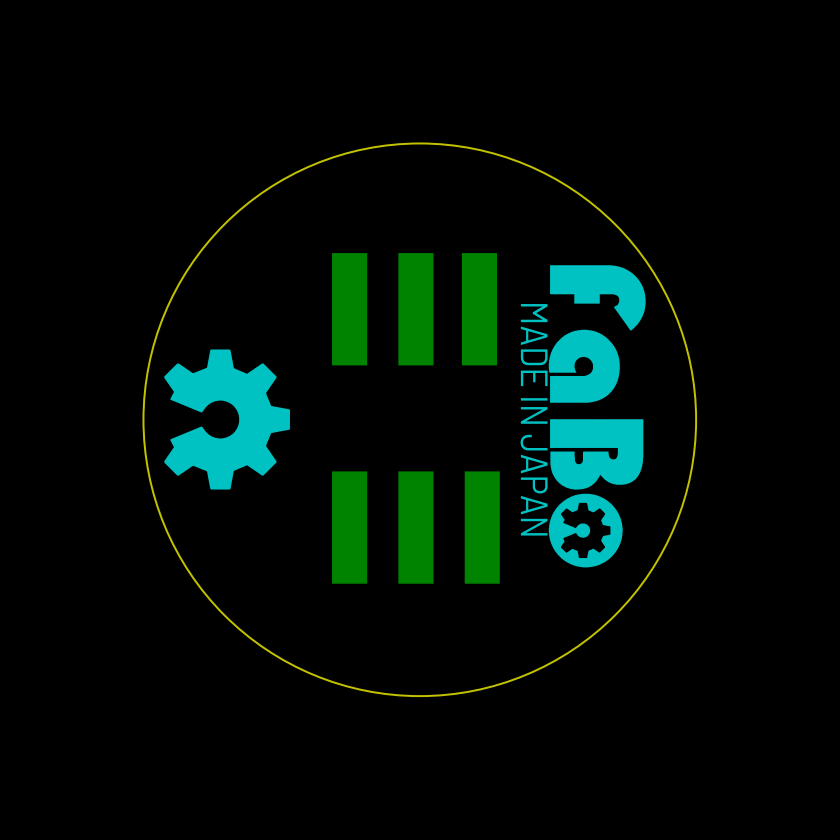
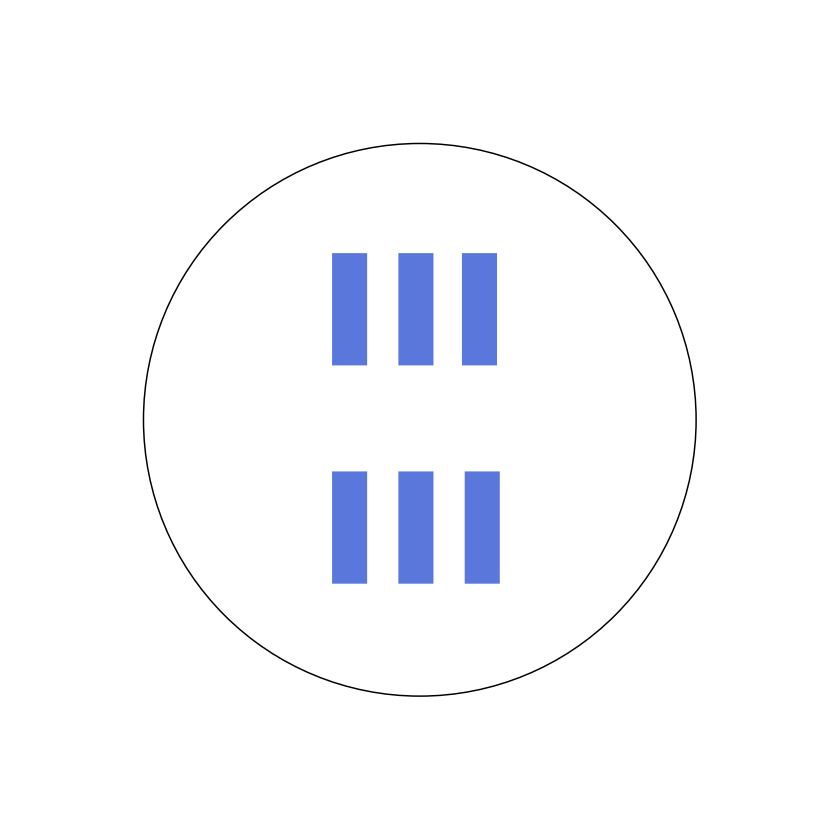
drawing: [548, 265, 646, 568] -> none
drawing: [164, 349, 290, 490] -> none
text: MADE IN JAPAN (534, 419) -> none

